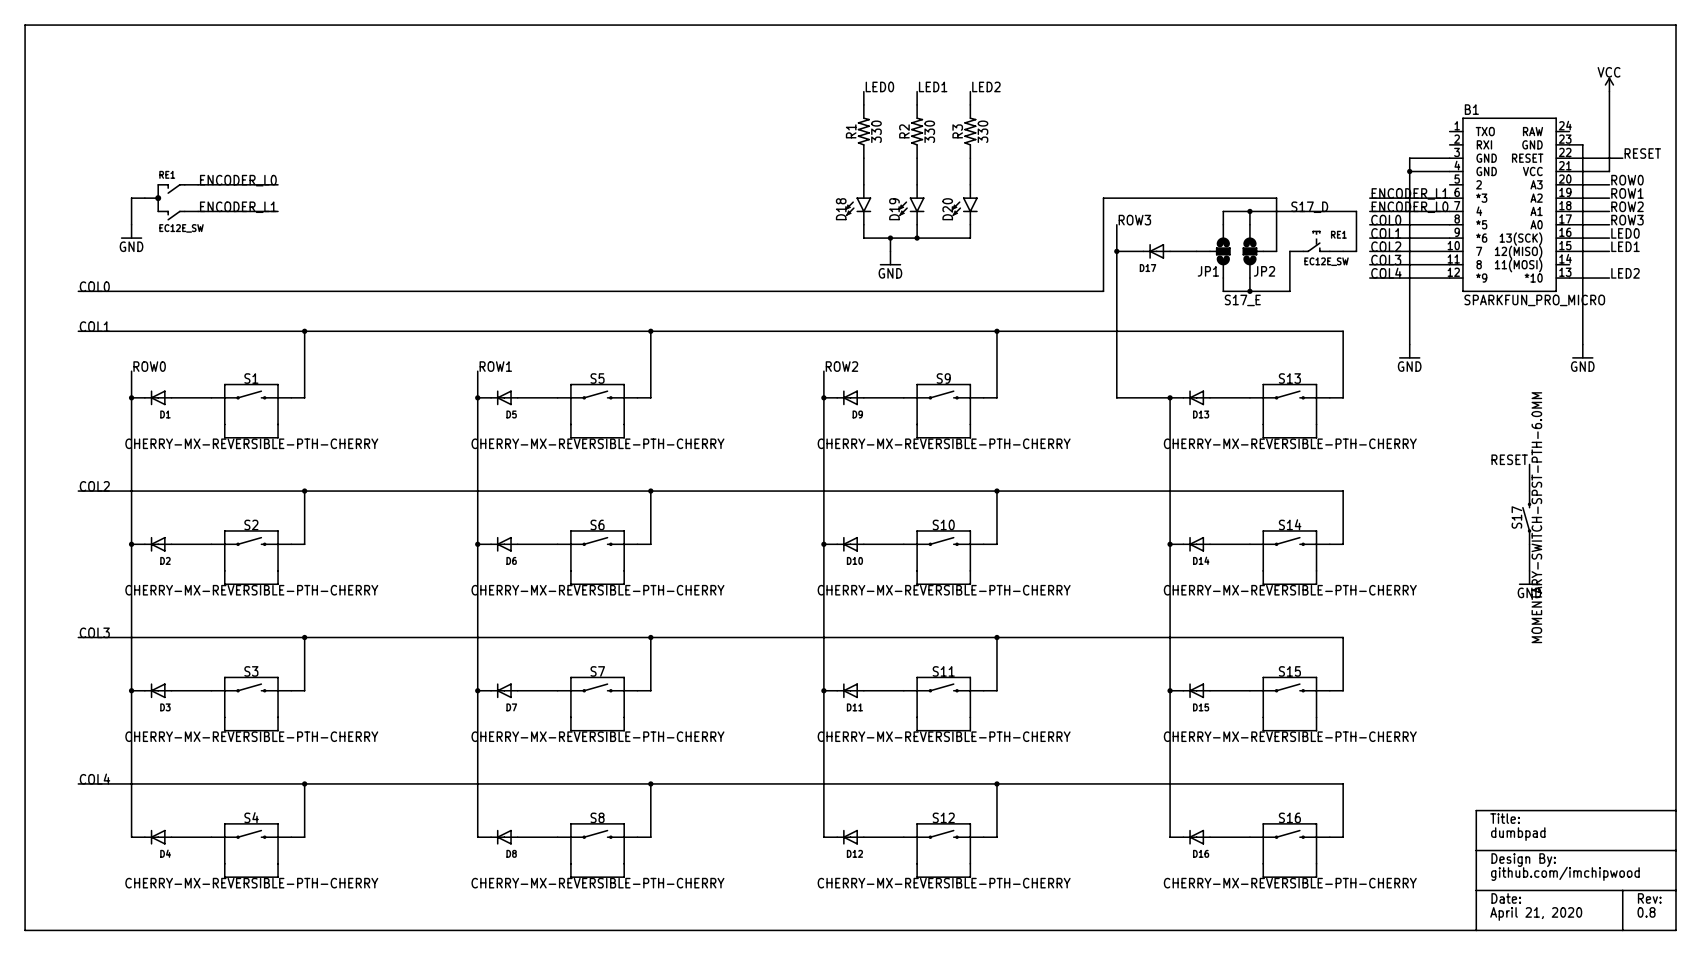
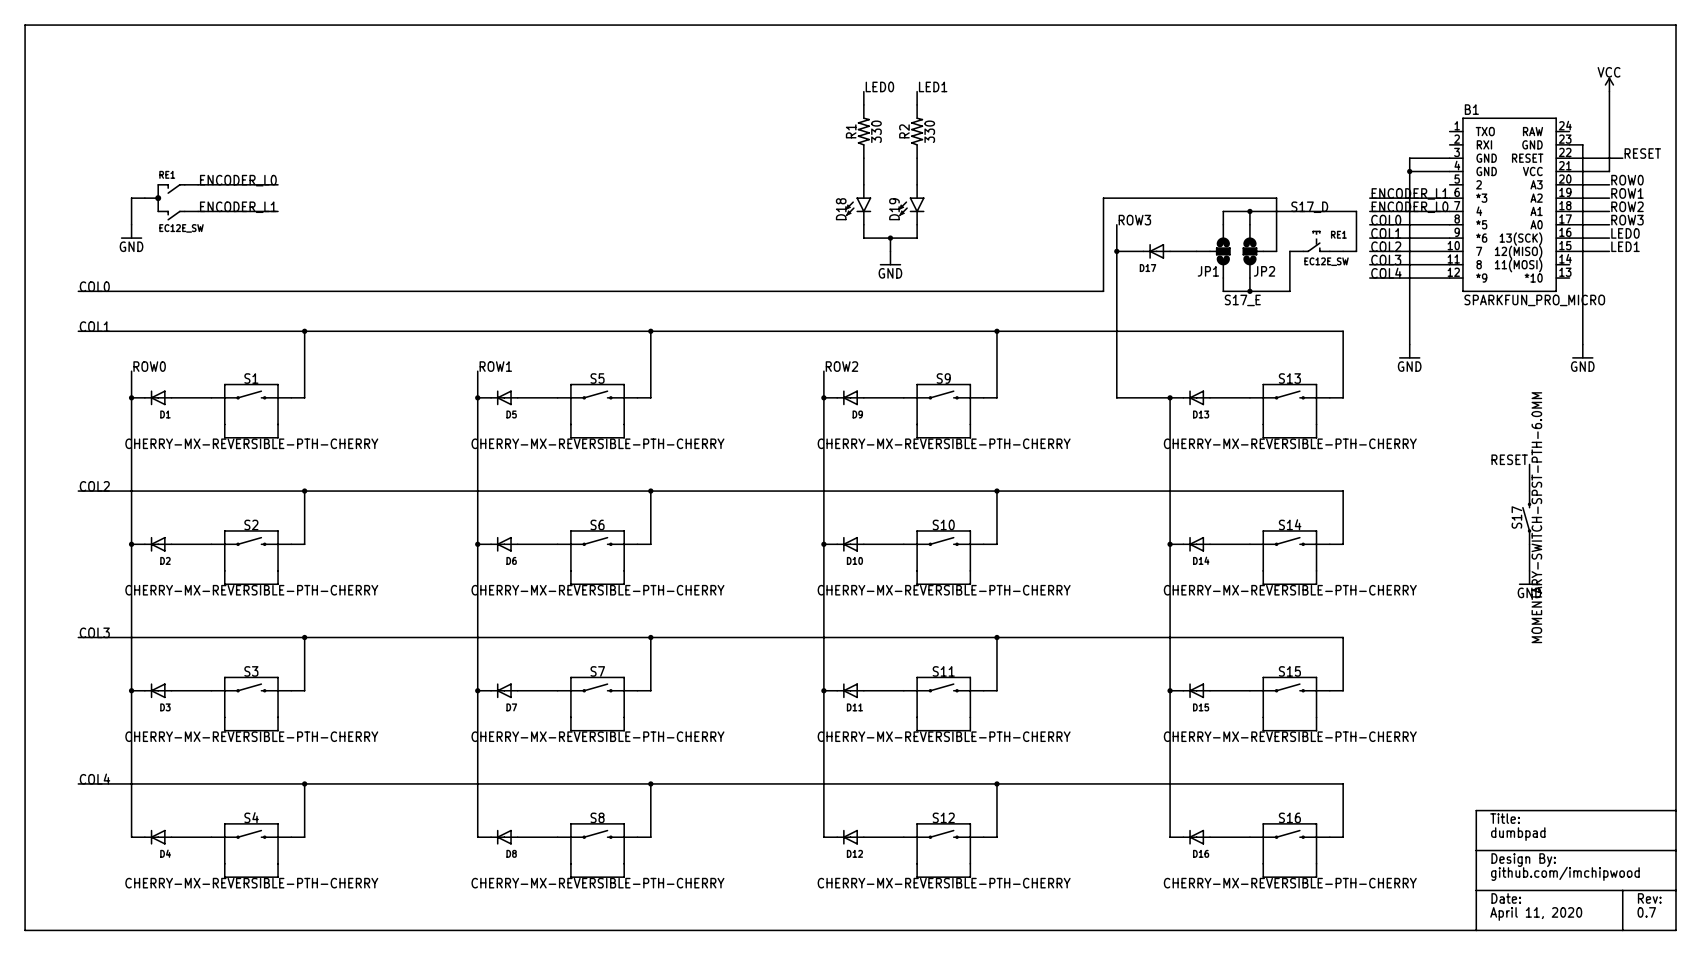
label: LED2 (986, 86) -> none
wire: (970, 91) (970, 104) -> none
R3: 330 (970, 131) -> none
wire: (970, 158) (970, 184) -> none
D20: (964, 204) -> none
wire: (970, 224) (970, 238) (917, 238) -> none
junction: (917, 238) -> none
label: LED2 (1625, 273) -> none
wire: (1569, 278) (1609, 278) -> none
text: 0.8 (1646, 912) -> 0.7 (1646, 912)
text: April 21, 2020 (1536, 913) -> April 11, 2020 (1536, 913)

